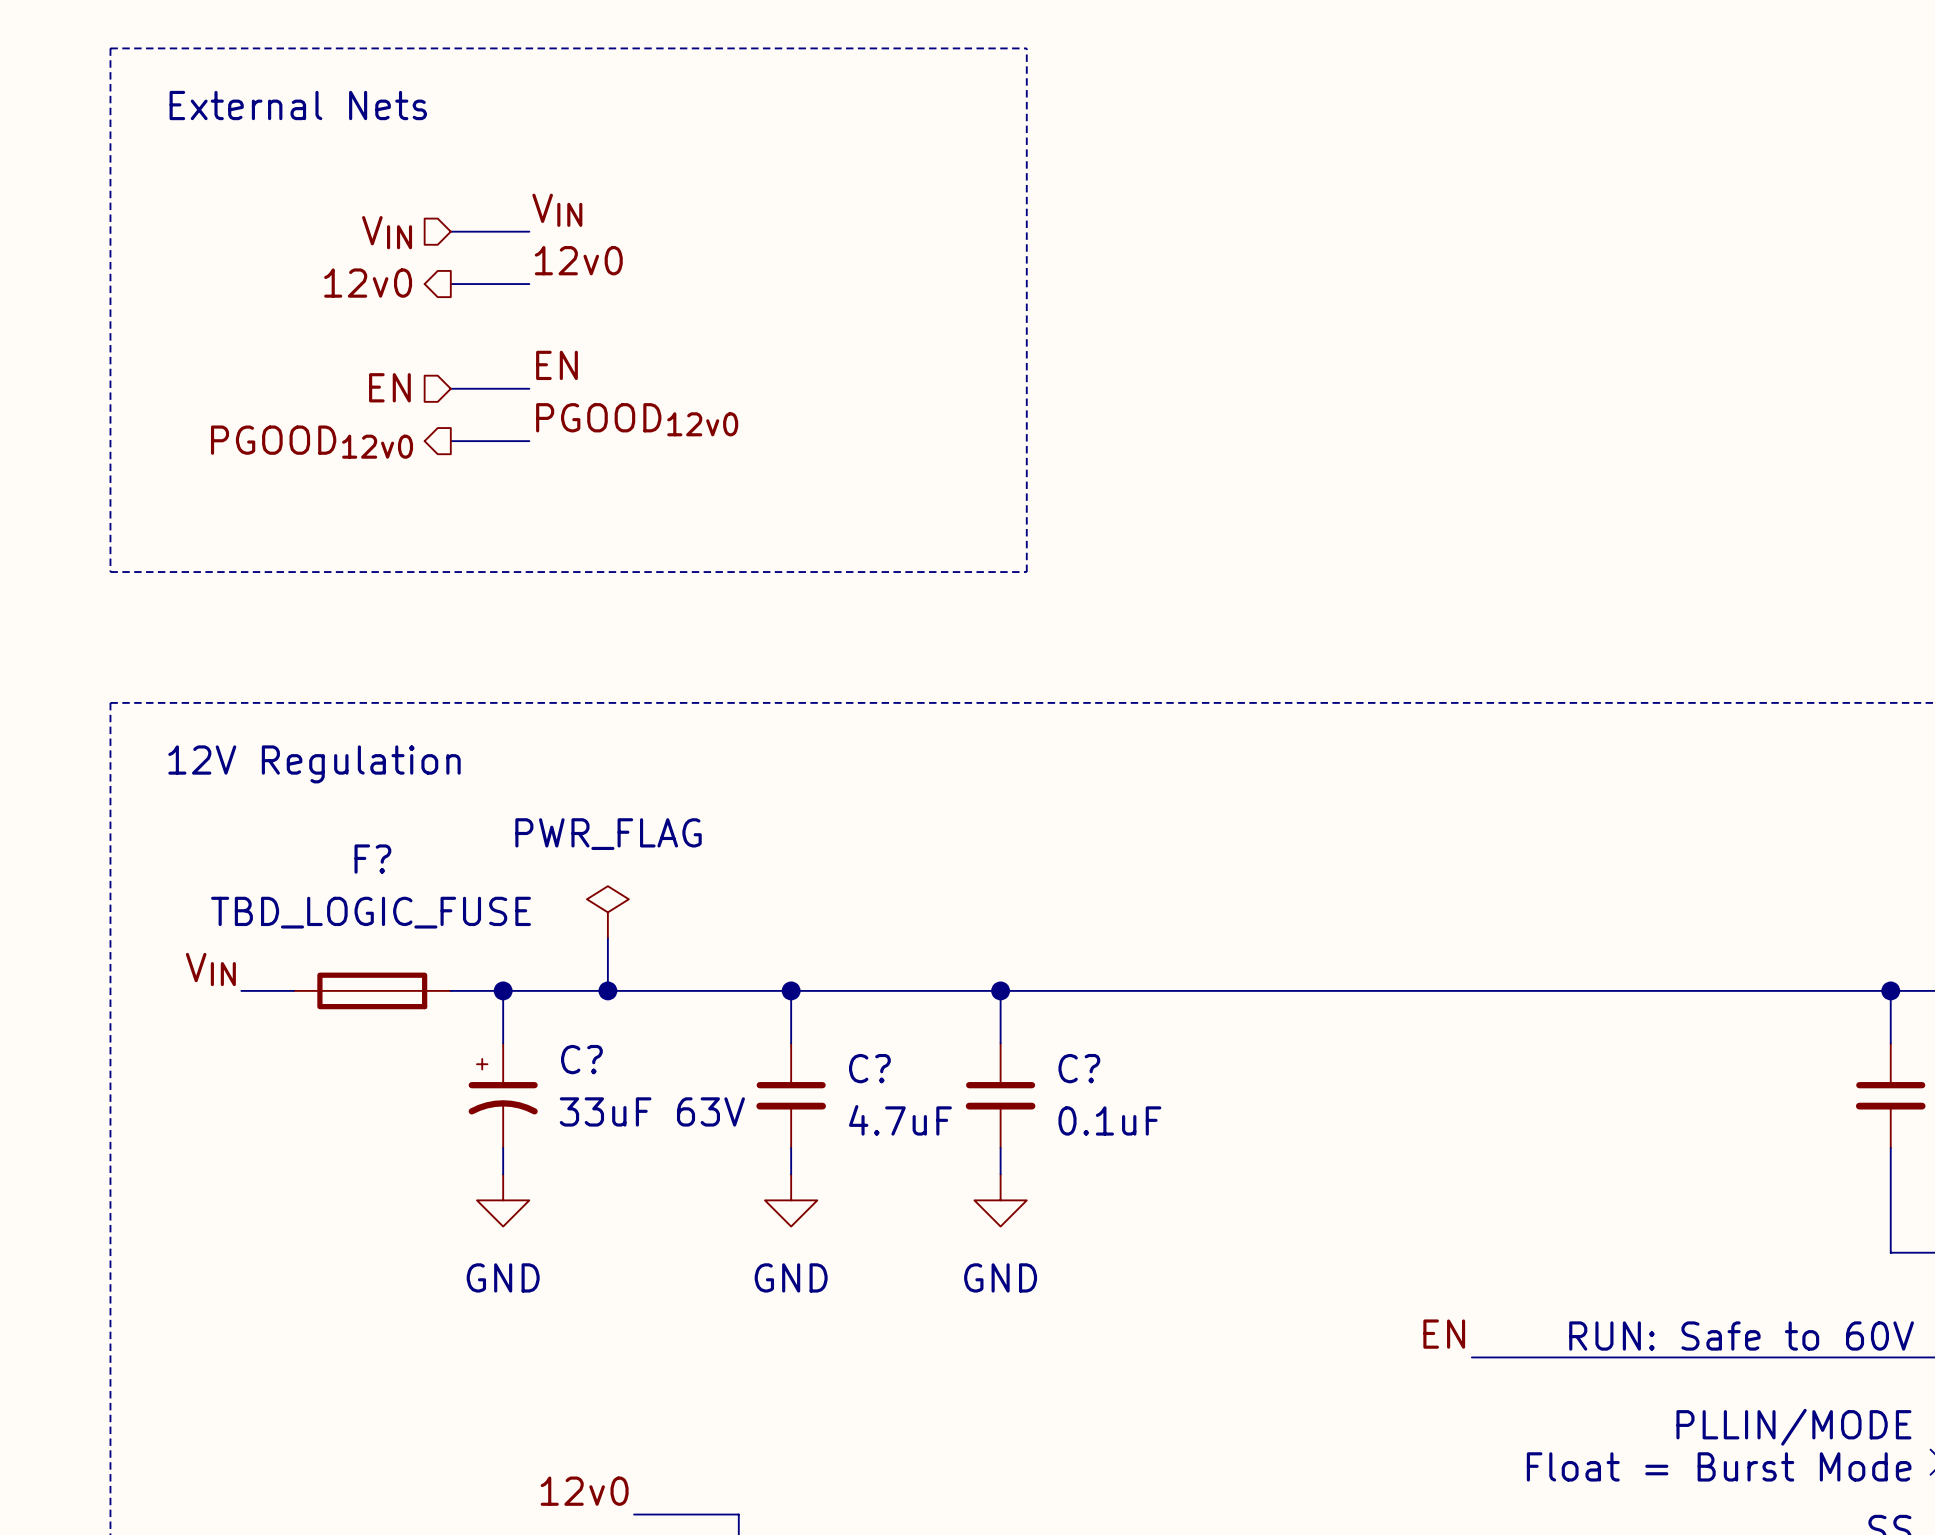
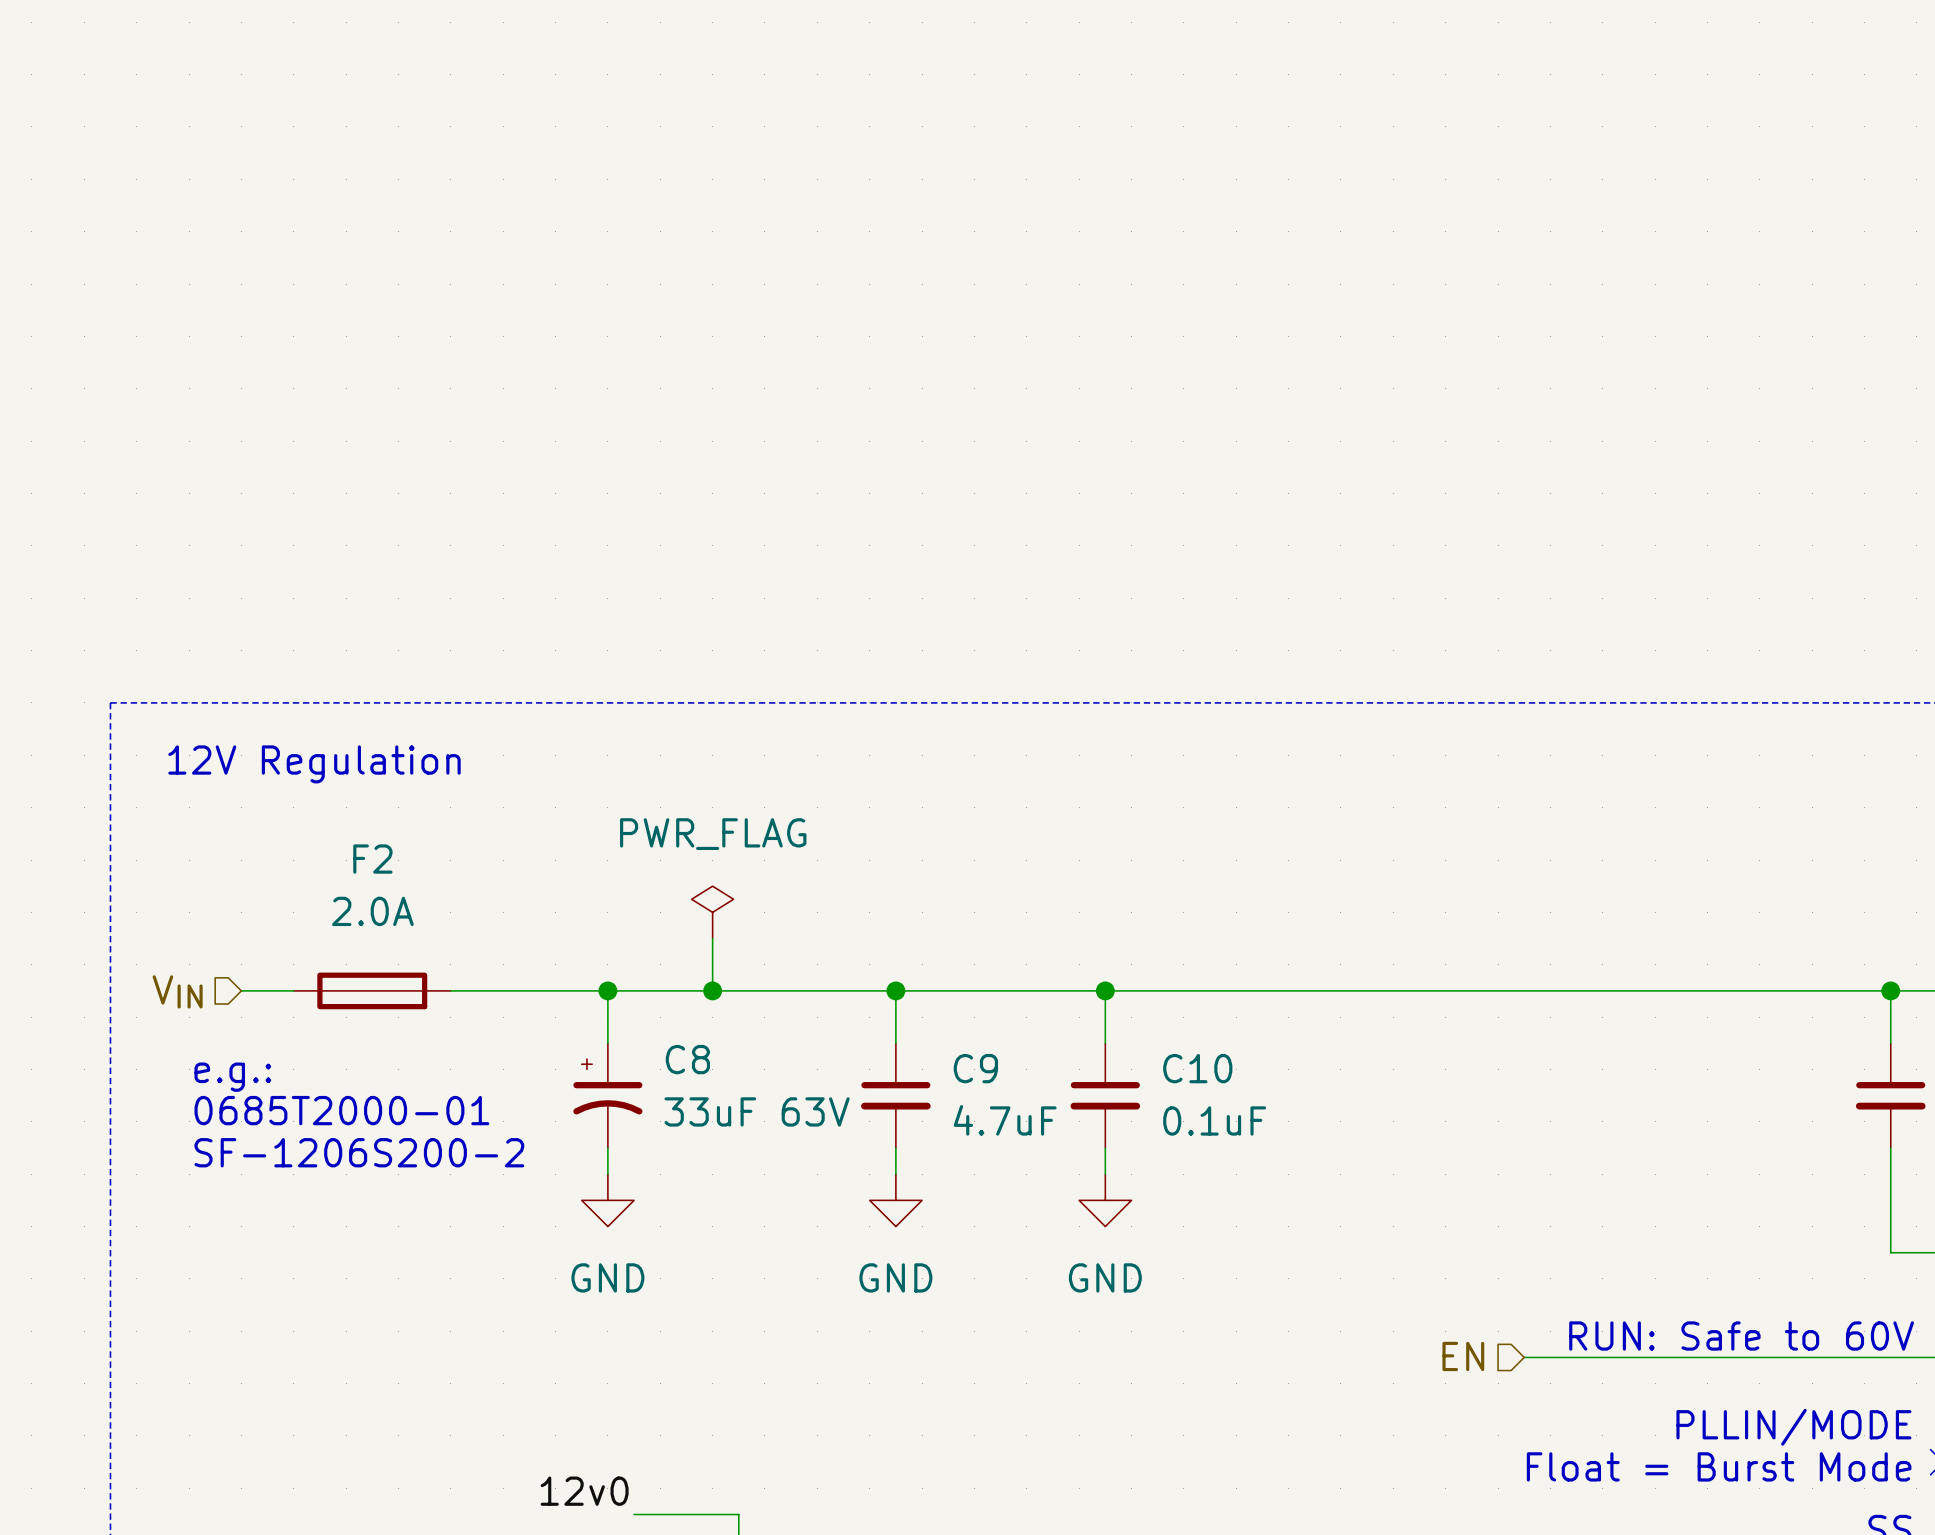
line: (110, 48) (110, 572) (1026, 572) (1026, 48) (110, 48) -> none
text: External Nets (298, 105) -> none
label: VIN (557, 210) -> none
wire: (450, 231) (529, 231) -> none
hierarchical label: VIN (387, 232) -> none
label: 12v0 (578, 260) -> none
hierarchical label: 12v0 (368, 283) -> none
wire: (450, 284) (529, 284) -> none
label: EN (556, 365) -> none
hierarchical label: EN (389, 387) -> none
wire: (450, 388) (529, 388) -> none
label: PGOOD12v0 (637, 419) -> none
wire: (450, 441) (529, 441) -> none
hierarchical label: PGOOD12v0 (312, 442) -> none
F? name: F? (372, 859) -> F2 (372, 859)
F? value: TBD_LOGIC_FUSE (371, 912) -> 2.0A (372, 911)
power symbol position: PWR_FLAG (607, 912) -> PWR_FLAG (712, 912)
wire: (607, 938) (607, 990) -> (607, 1043) (607, 990)
label: VIN (210, 969) -> none
wire: (503, 990) (503, 1043) -> (712, 938) (712, 990)
junction: (503, 990) -> none
junction: none -> (712, 990)
wire: (791, 990) (791, 1043) -> (895, 990) (895, 1043)
junction: (791, 990) -> none
junction: none -> (895, 990)
wire: (1000, 990) (1000, 1043) -> (1105, 990) (1105, 1043)
junction: (1000, 990) -> none
junction: none -> (1105, 990)
hierarchical label: none -> VIN (177, 991)
text: none -> e.g.: (232, 1077)
C?: 33uF 63V (503, 1095) -> none
C8: none -> 33uF 63V (607, 1095)
C?: 4.7uF (791, 1095) -> none
C9: none -> 4.7uF (895, 1095)
C?: 0.1uF (1000, 1095) -> none
C10: none -> 0.1uF (1105, 1095)
text: none -> 0685T2000-01 (341, 1110)
wire: (503, 1148) (503, 1174) -> (607, 1148) (607, 1174)
wire: (791, 1148) (791, 1174) -> (895, 1148) (895, 1174)
wire: (1000, 1148) (1000, 1174) -> (1105, 1148) (1105, 1174)
text: none -> SF-1206S200-2 (359, 1152)
power symbol: GND (503, 1200) -> none
power symbol: none -> GND (607, 1200)
power symbol: GND (791, 1200) -> none
power symbol: none -> GND (895, 1200)
power symbol: GND (1000, 1200) -> none
power symbol: none -> GND (1105, 1200)
label: EN (1444, 1334) -> none
hierarchical label: none -> EN (1463, 1356)
wire: (1471, 1357) (1524, 1357) -> none

